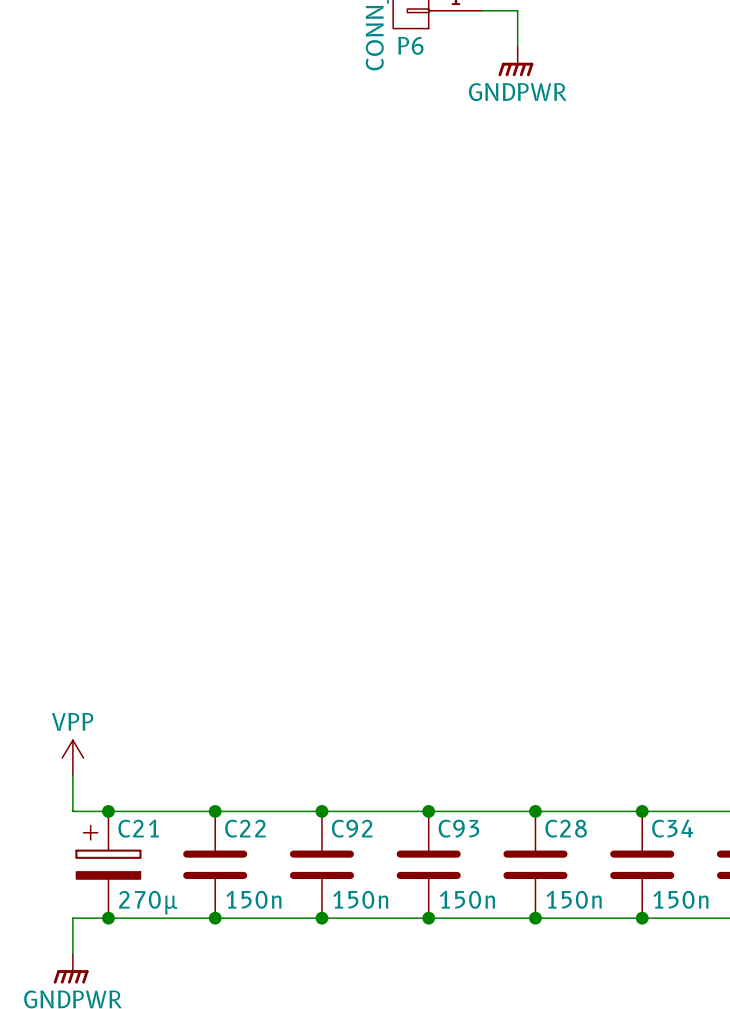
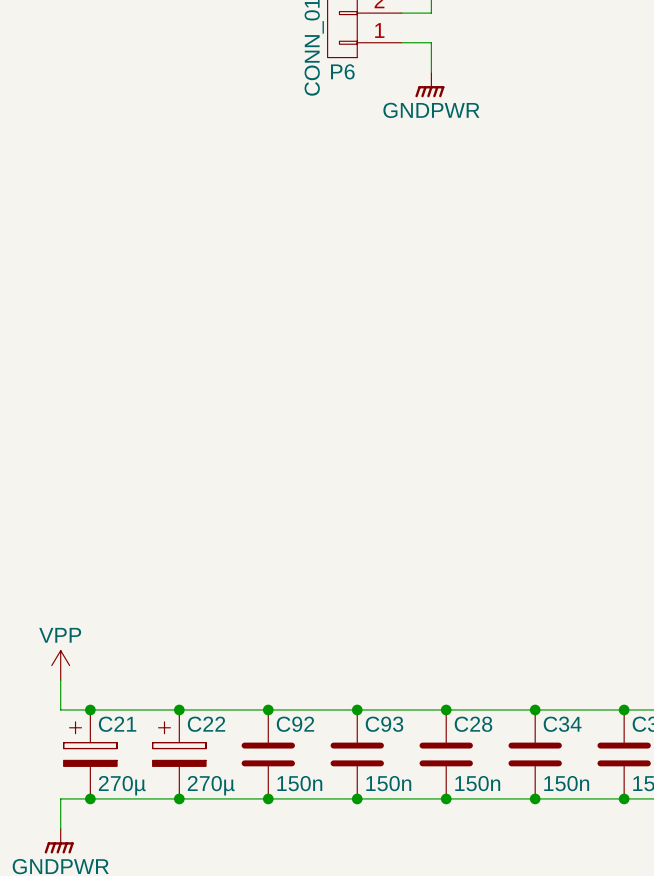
C22 symbol: [183, 811, 248, 919] -> [152, 709, 207, 799]
C22 value: 150n (253, 899) -> 270µ (211, 785)

